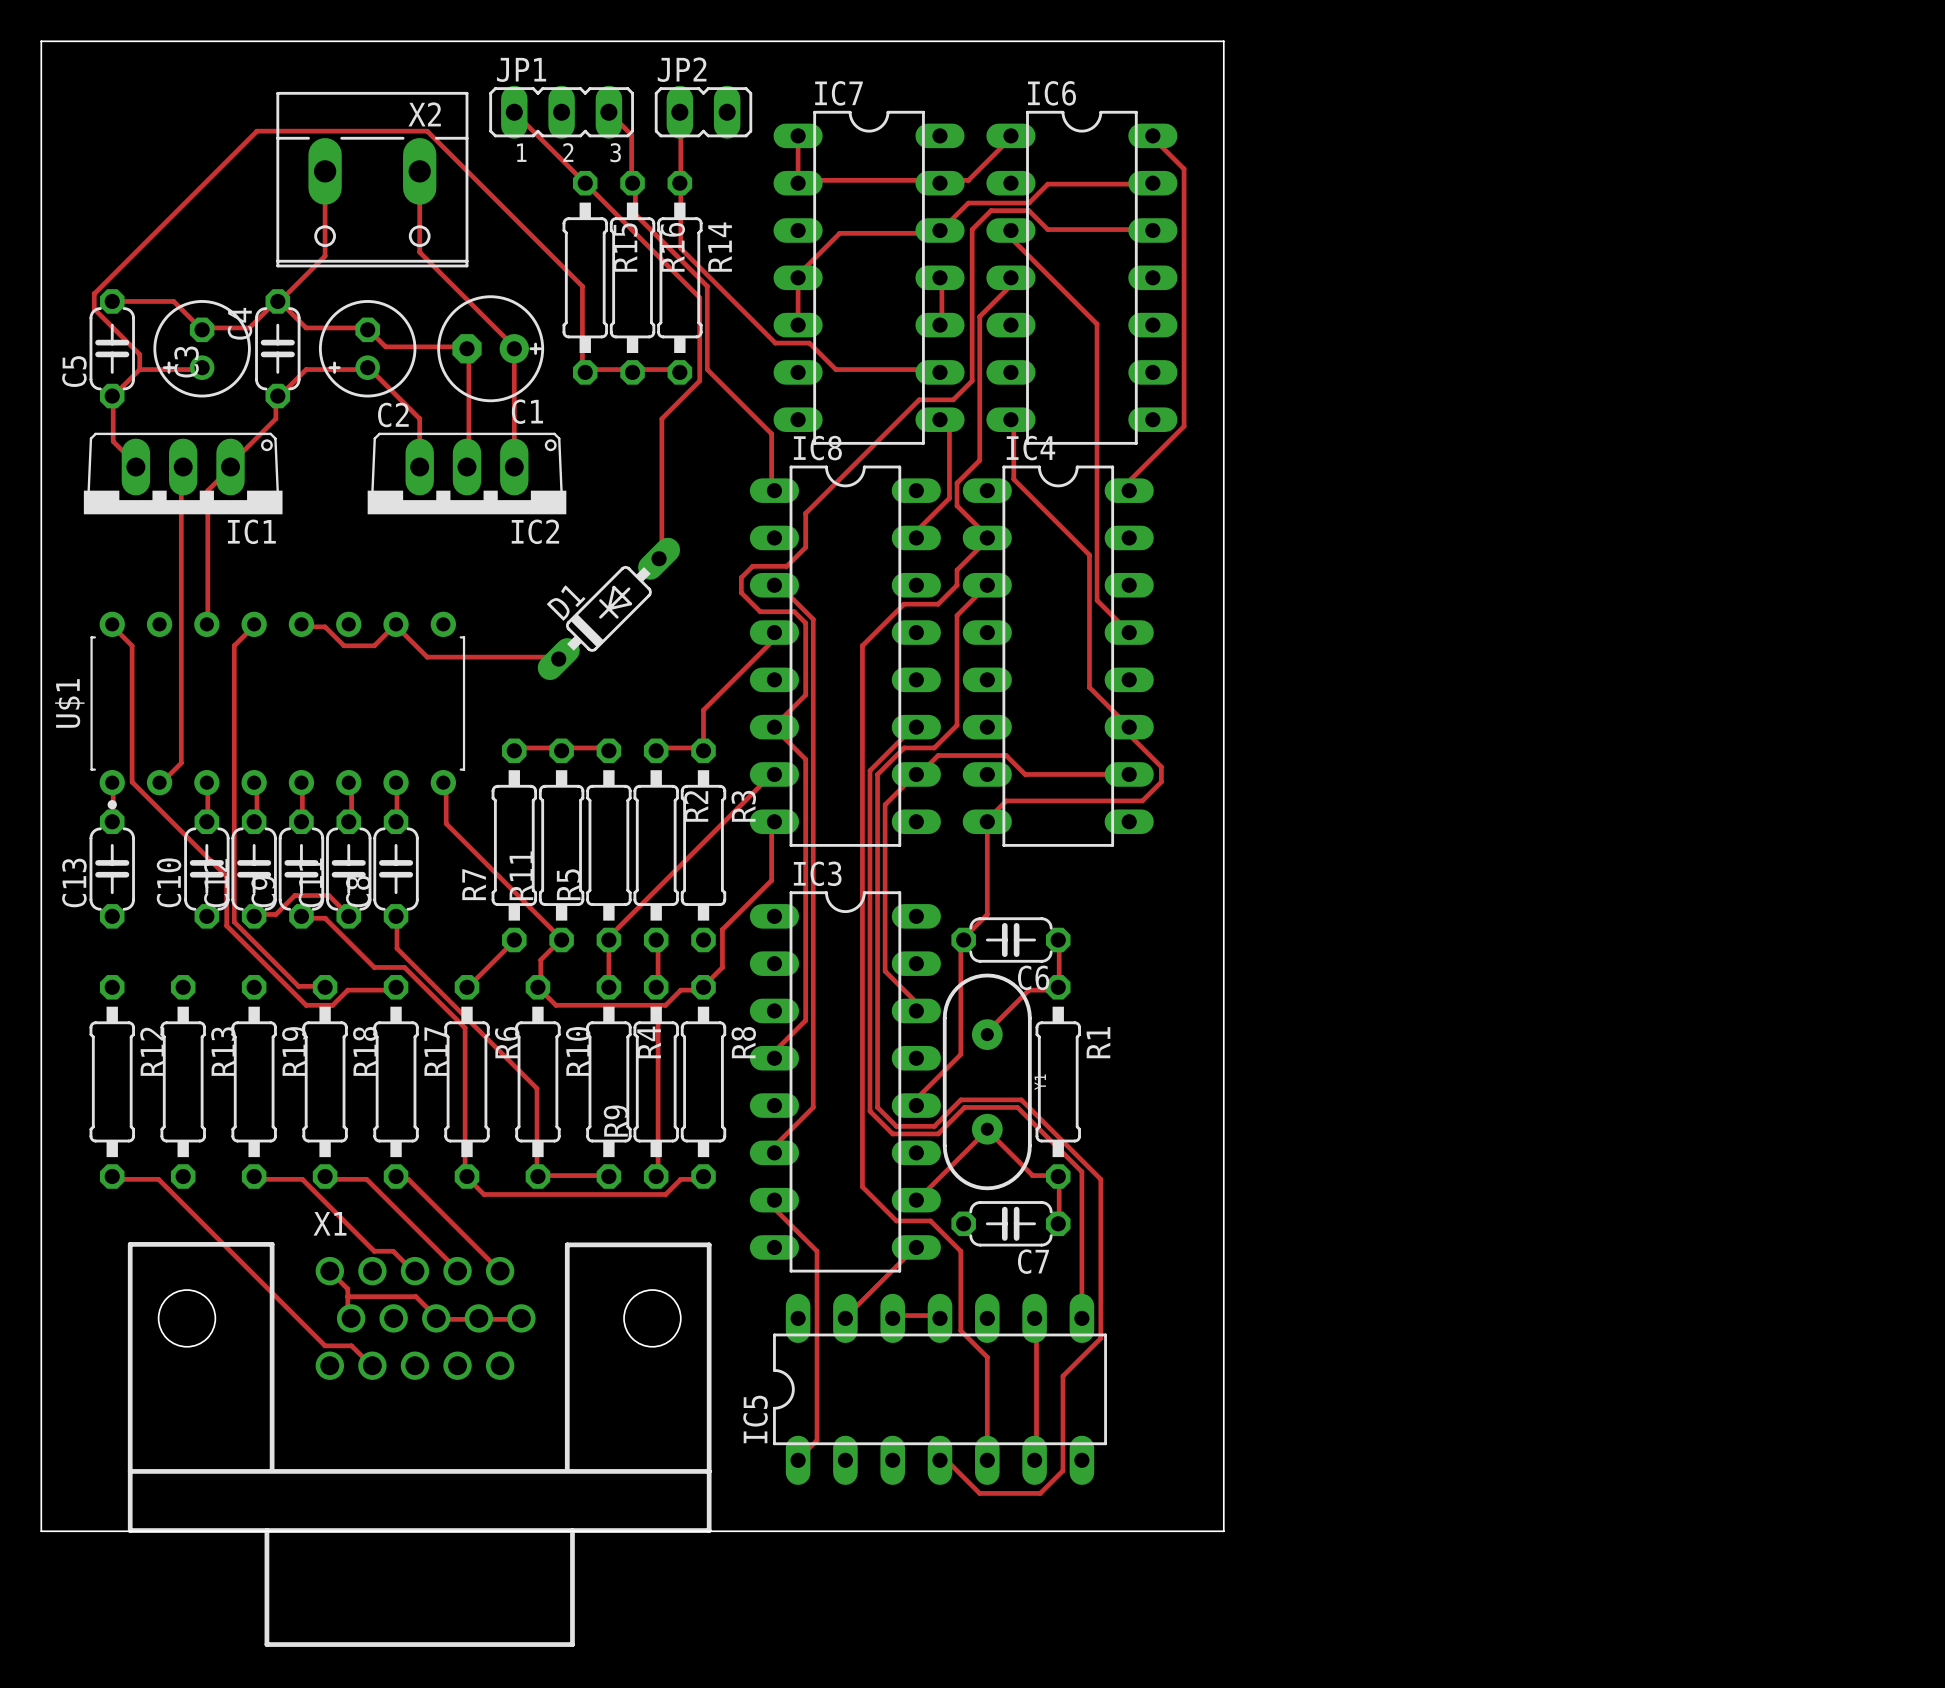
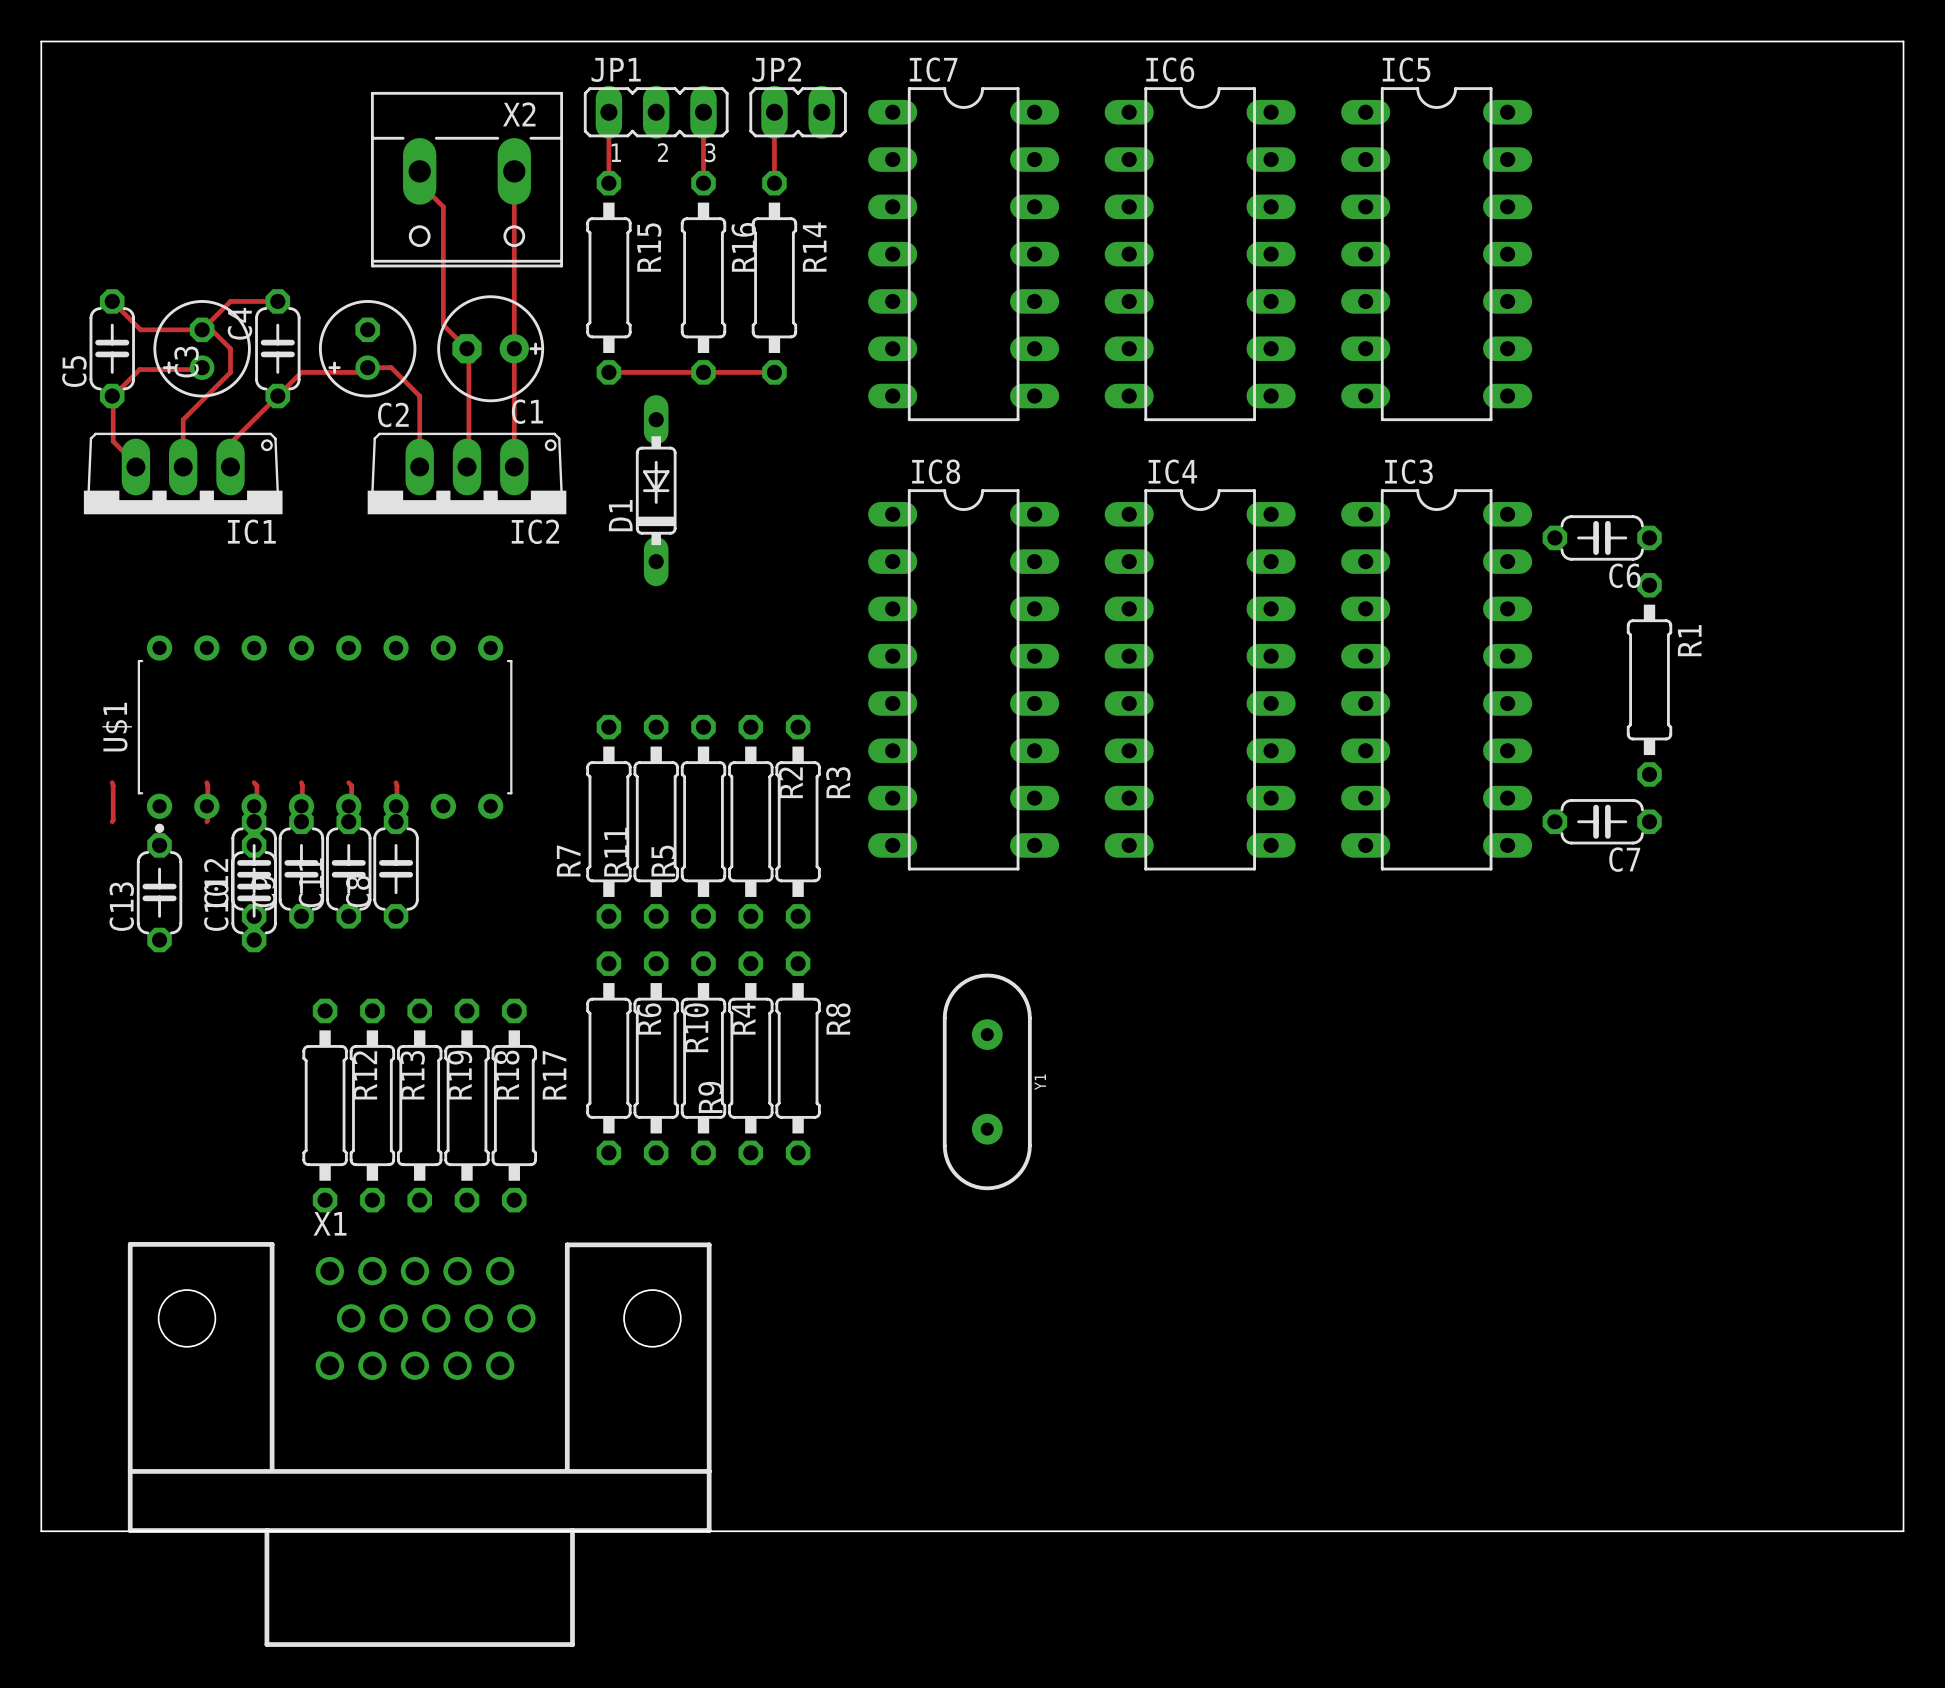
board edge: (41, 41) (1223, 41) (1223, 1531) -> (41, 41) (1903, 41) (1903, 1531) (1223, 1531)
track: (514, 112) (699, 297) (699, 380) (661, 418) (661, 554) (659, 558) -> none
JP1 position: (561, 112) -> (656, 112)
track: (608, 112) (631, 134) (631, 180) (635, 184) (635, 214) (707, 286) (707, 369) (771, 433) (771, 490) (774, 490) -> (608, 112) (608, 183)
track: (679, 112) (680, 248) (775, 343) (809, 343) (835, 369) (938, 369) (940, 372) -> none
track: none -> (703, 112) (703, 183)
JP2 position: (703, 112) -> (798, 112)
track: none -> (774, 112) (774, 183)
track: (798, 135) (798, 183) -> none
track: (1010, 135) (968, 180) (941, 180) (940, 183) (938, 180) (798, 180) -> none
track: (1152, 135) (1184, 169) (1184, 426) (1131, 479) (1131, 490) (1129, 490) -> none
track: (325, 171) (325, 256) (279, 301) (306, 327) (366, 327) (385, 346) (465, 346) -> none
track: none -> (514, 171) (514, 346)
X2 position: (372, 179) -> (467, 179)
track: (419, 183) (419, 252) (514, 346) -> (419, 183) (443, 206) (443, 325) (465, 346)
track: (1152, 183) (1047, 184) (1028, 203) (968, 203) (938, 233) (839, 233) (798, 274) (798, 325) -> none
track: (1010, 230) (1013, 233) (1013, 240) (1097, 324) (1097, 600) (1129, 632) -> none
track: (1152, 230) (1047, 229) (1028, 210) (991, 210) (972, 229) (972, 380) (953, 399) (919, 399) (805, 513) (805, 547) (786, 566) (752, 566) (741, 577) (741, 592) (760, 611) (794, 611) (805, 623) (805, 694) (774, 727) (805, 759) (805, 1020) (775, 1050) (774, 1058) -> none
R15 position: (585, 277) -> (608, 277)
R16 position: (632, 277) -> (703, 277)
R14 position: (679, 277) -> (774, 277)
IC7 position: (869, 277) -> (963, 254)
track: (940, 277) (941, 278) (941, 324) (940, 325) -> none
track: (1010, 277) (1010, 286) (979, 316) (979, 460) (957, 483) (957, 505) (987, 536) (987, 539) (957, 570) (957, 585) (938, 604) (904, 604) (862, 645) (862, 1186) (896, 1220) (930, 1220) (960, 1251) (960, 1330) (987, 1357) (987, 1460) -> none
IC6 position: (1081, 277) -> (1200, 254)
track: (112, 301) (173, 301) (202, 329) -> (112, 301) (140, 329) (202, 329)
track: (275, 301) (249, 327) (204, 327) -> (275, 301) (230, 301) (204, 327)
track: (139, 369) (139, 354) (94, 309) (94, 293) (256, 131) (427, 131) (582, 286) (582, 369) (585, 372) (586, 369) (631, 369) (632, 372) (635, 369) (677, 369) (679, 372) -> none
track: none -> (608, 372) (774, 372)
track: (419, 418) (367, 367) (366, 369) (306, 369) (279, 396) (275, 396) (275, 418) (230, 464) -> (419, 418) (419, 396) (391, 367) (367, 367) (362, 372) (301, 372) (230, 443) (230, 464)
track: (940, 419) (949, 430) (949, 498) (919, 528) (919, 536) (916, 537) -> none
track: (1010, 419) (1013, 422) (1013, 479) (1089, 554) (1089, 687) (1131, 729) (1131, 736) (1161, 766) (1161, 782) (1142, 800) (1006, 800) (987, 819) (987, 914) (960, 940) (960, 1054) (919, 1096) (919, 1103) (916, 1105) -> none
track: (183, 467) (181, 467) (181, 763) (159, 782) -> (183, 467) (183, 419) (230, 372) (230, 348) (206, 325)
track: (230, 467) (207, 490) (206, 624) -> none
track: (774, 585) (779, 585) (813, 619) (813, 1107) (775, 1145) (774, 1152) -> none
track: (987, 585) (957, 615) (957, 725) (934, 747) (904, 747) (877, 774) (877, 1107) (896, 1126) (934, 1126) (960, 1099) (1021, 1099) (1100, 1179) (1100, 1338) (1062, 1376) (1062, 1470) (1040, 1493) (979, 1493) (949, 1463) (941, 1463) (940, 1460) -> none
D1 rotation: 0° (608, 608) -> 45° counterclockwise (656, 490)
D1 position: (608, 608) -> (656, 490)
track: (112, 624) (132, 645) (132, 782) (226, 876) (226, 925) (306, 1005) (332, 1005) (347, 990) (393, 990) (396, 987) -> none
track: (254, 624) (234, 645) (234, 922) (298, 986) (325, 987) -> none
track: (301, 624) (302, 626) (325, 626) (344, 645) (374, 645) (396, 624) (427, 657) (555, 657) (558, 659) -> none
track: (774, 632) (771, 634) (771, 642) (703, 710) (703, 750) -> none
IC8 position: (845, 656) -> (963, 679)
IC4 position: (1058, 656) -> (1200, 679)
U$1 position: (277, 710) -> (325, 734)
track: (916, 727) (915, 725) (870, 770) (870, 1111) (892, 1133) (938, 1133) (964, 1107) (1017, 1107) (1081, 1171) (1081, 1318) -> none
track: (703, 747) (658, 747) (656, 750) -> none
track: (514, 750) (514, 747) (559, 747) (561, 750) (563, 747) (608, 747) (608, 750) -> none
track: (774, 774) (771, 774) (608, 937) (608, 987) -> none
track: (1129, 774) (1025, 774) (1006, 755) (938, 755) (919, 774) (915, 774) (885, 804) (885, 971) (915, 1001) (916, 1010) -> none
track: (443, 782) (446, 785) (446, 823) (561, 940) (540, 959) (540, 986) (537, 987) (555, 1005) (665, 1005) (680, 990) (703, 990) (703, 986) (722, 967) (722, 929) (771, 880) (771, 823) (774, 821) -> none
R7 position: (514, 845) -> (608, 821)
R11 position: (561, 845) -> (656, 821)
R5 position: (608, 845) -> (703, 821)
R2 position: (656, 845) -> (750, 821)
R3 position: (703, 845) -> (798, 821)
C13 position: (112, 869) -> (159, 892)
C10 position: (206, 869) -> (254, 892)
track: (254, 916) (256, 914) (275, 914) (294, 895) (328, 895) (348, 916) -> none
track: (301, 916) (302, 918) (325, 918) (374, 967) (404, 967) (465, 1027) (465, 1175) (484, 1194) (665, 1194) (680, 1179) (703, 1179) (703, 1176) -> none
track: (396, 916) (397, 948) (537, 1088) (537, 1175) (608, 1176) -> none
track: (514, 940) (467, 987) -> none
track: (656, 940) (658, 940) (658, 986) (656, 987) -> none
C6 position: (1010, 940) -> (1602, 537)
track: (1058, 940) (1059, 986) (1055, 990) (1028, 990) (987, 1031) (987, 1034) -> none
track: (658, 1005) (658, 1175) (656, 1176) -> none
R12 position: (112, 1081) -> (325, 1105)
R13 position: (183, 1081) -> (372, 1105)
R19 position: (254, 1081) -> (419, 1105)
R18 position: (325, 1081) -> (467, 1105)
R17 position: (396, 1081) -> (514, 1105)
R6 position: (467, 1081) -> (608, 1058)
R10 position: (537, 1081) -> (656, 1058)
R4 position: (608, 1081) -> (703, 1058)
R9 position: (656, 1081) -> (750, 1058)
R8 position: (703, 1081) -> (798, 1058)
IC3 position: (845, 1081) -> (1436, 679)
R1 position: (1058, 1081) -> (1649, 679)
track: (987, 1130) (916, 1200) -> none
track: (987, 1130) (1032, 1175) (1058, 1176) (1058, 1223) -> none
track: (112, 1176) (113, 1179) (158, 1179) (325, 1345) (351, 1345) (372, 1365) -> none
track: (254, 1176) (256, 1179) (302, 1179) (374, 1251) (393, 1251) (414, 1271) -> none
track: (325, 1176) (325, 1179) (366, 1179) (457, 1271) -> none
track: (396, 1176) (397, 1179) (408, 1179) (500, 1271) -> none
track: (774, 1200) (775, 1209) (817, 1251) (817, 1440) (798, 1460) -> none
C7 position: (1010, 1223) -> (1602, 821)
track: (916, 1247) (845, 1318) -> none
track: (329, 1271) (347, 1289) (347, 1315) (351, 1318) -> none
track: (347, 1296) (415, 1296) (438, 1319) (521, 1318) -> none
track: (892, 1318) (892, 1315) (938, 1315) (940, 1318) -> none
track: (1034, 1318) (1036, 1319) (1036, 1459) (1034, 1460) -> none
IC5 rotation: 0° (940, 1389) -> 90° clockwise (1436, 254)
IC5 position: (940, 1389) -> (1436, 254)

